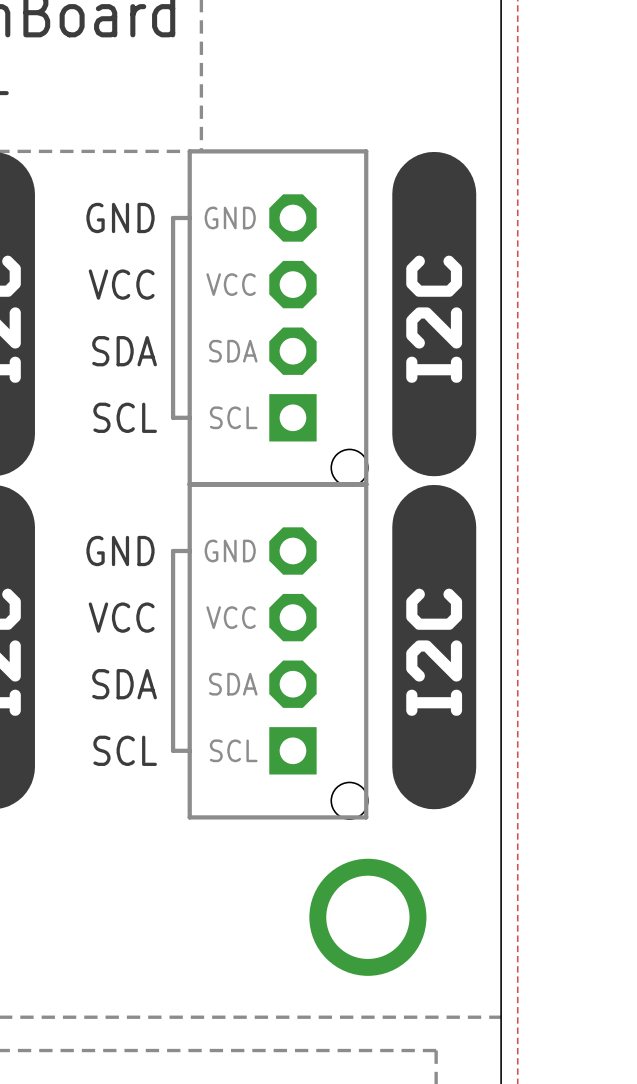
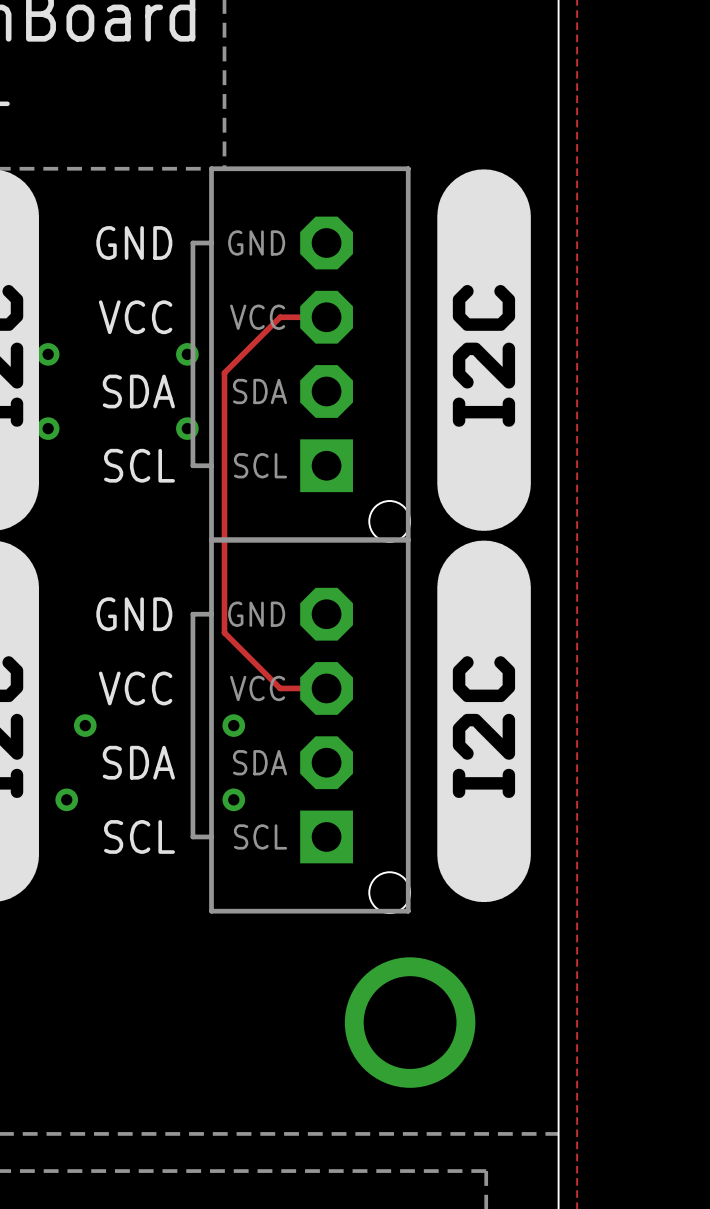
track: none -> (326, 317) (280, 317) (224, 372) (224, 632) (280, 688) (326, 688)
via: none -> (48, 354)
via: none -> (187, 354)
via: none -> (48, 428)
via: none -> (187, 428)
via: none -> (85, 725)
via: none -> (233, 725)
via: none -> (66, 799)
via: none -> (233, 799)

